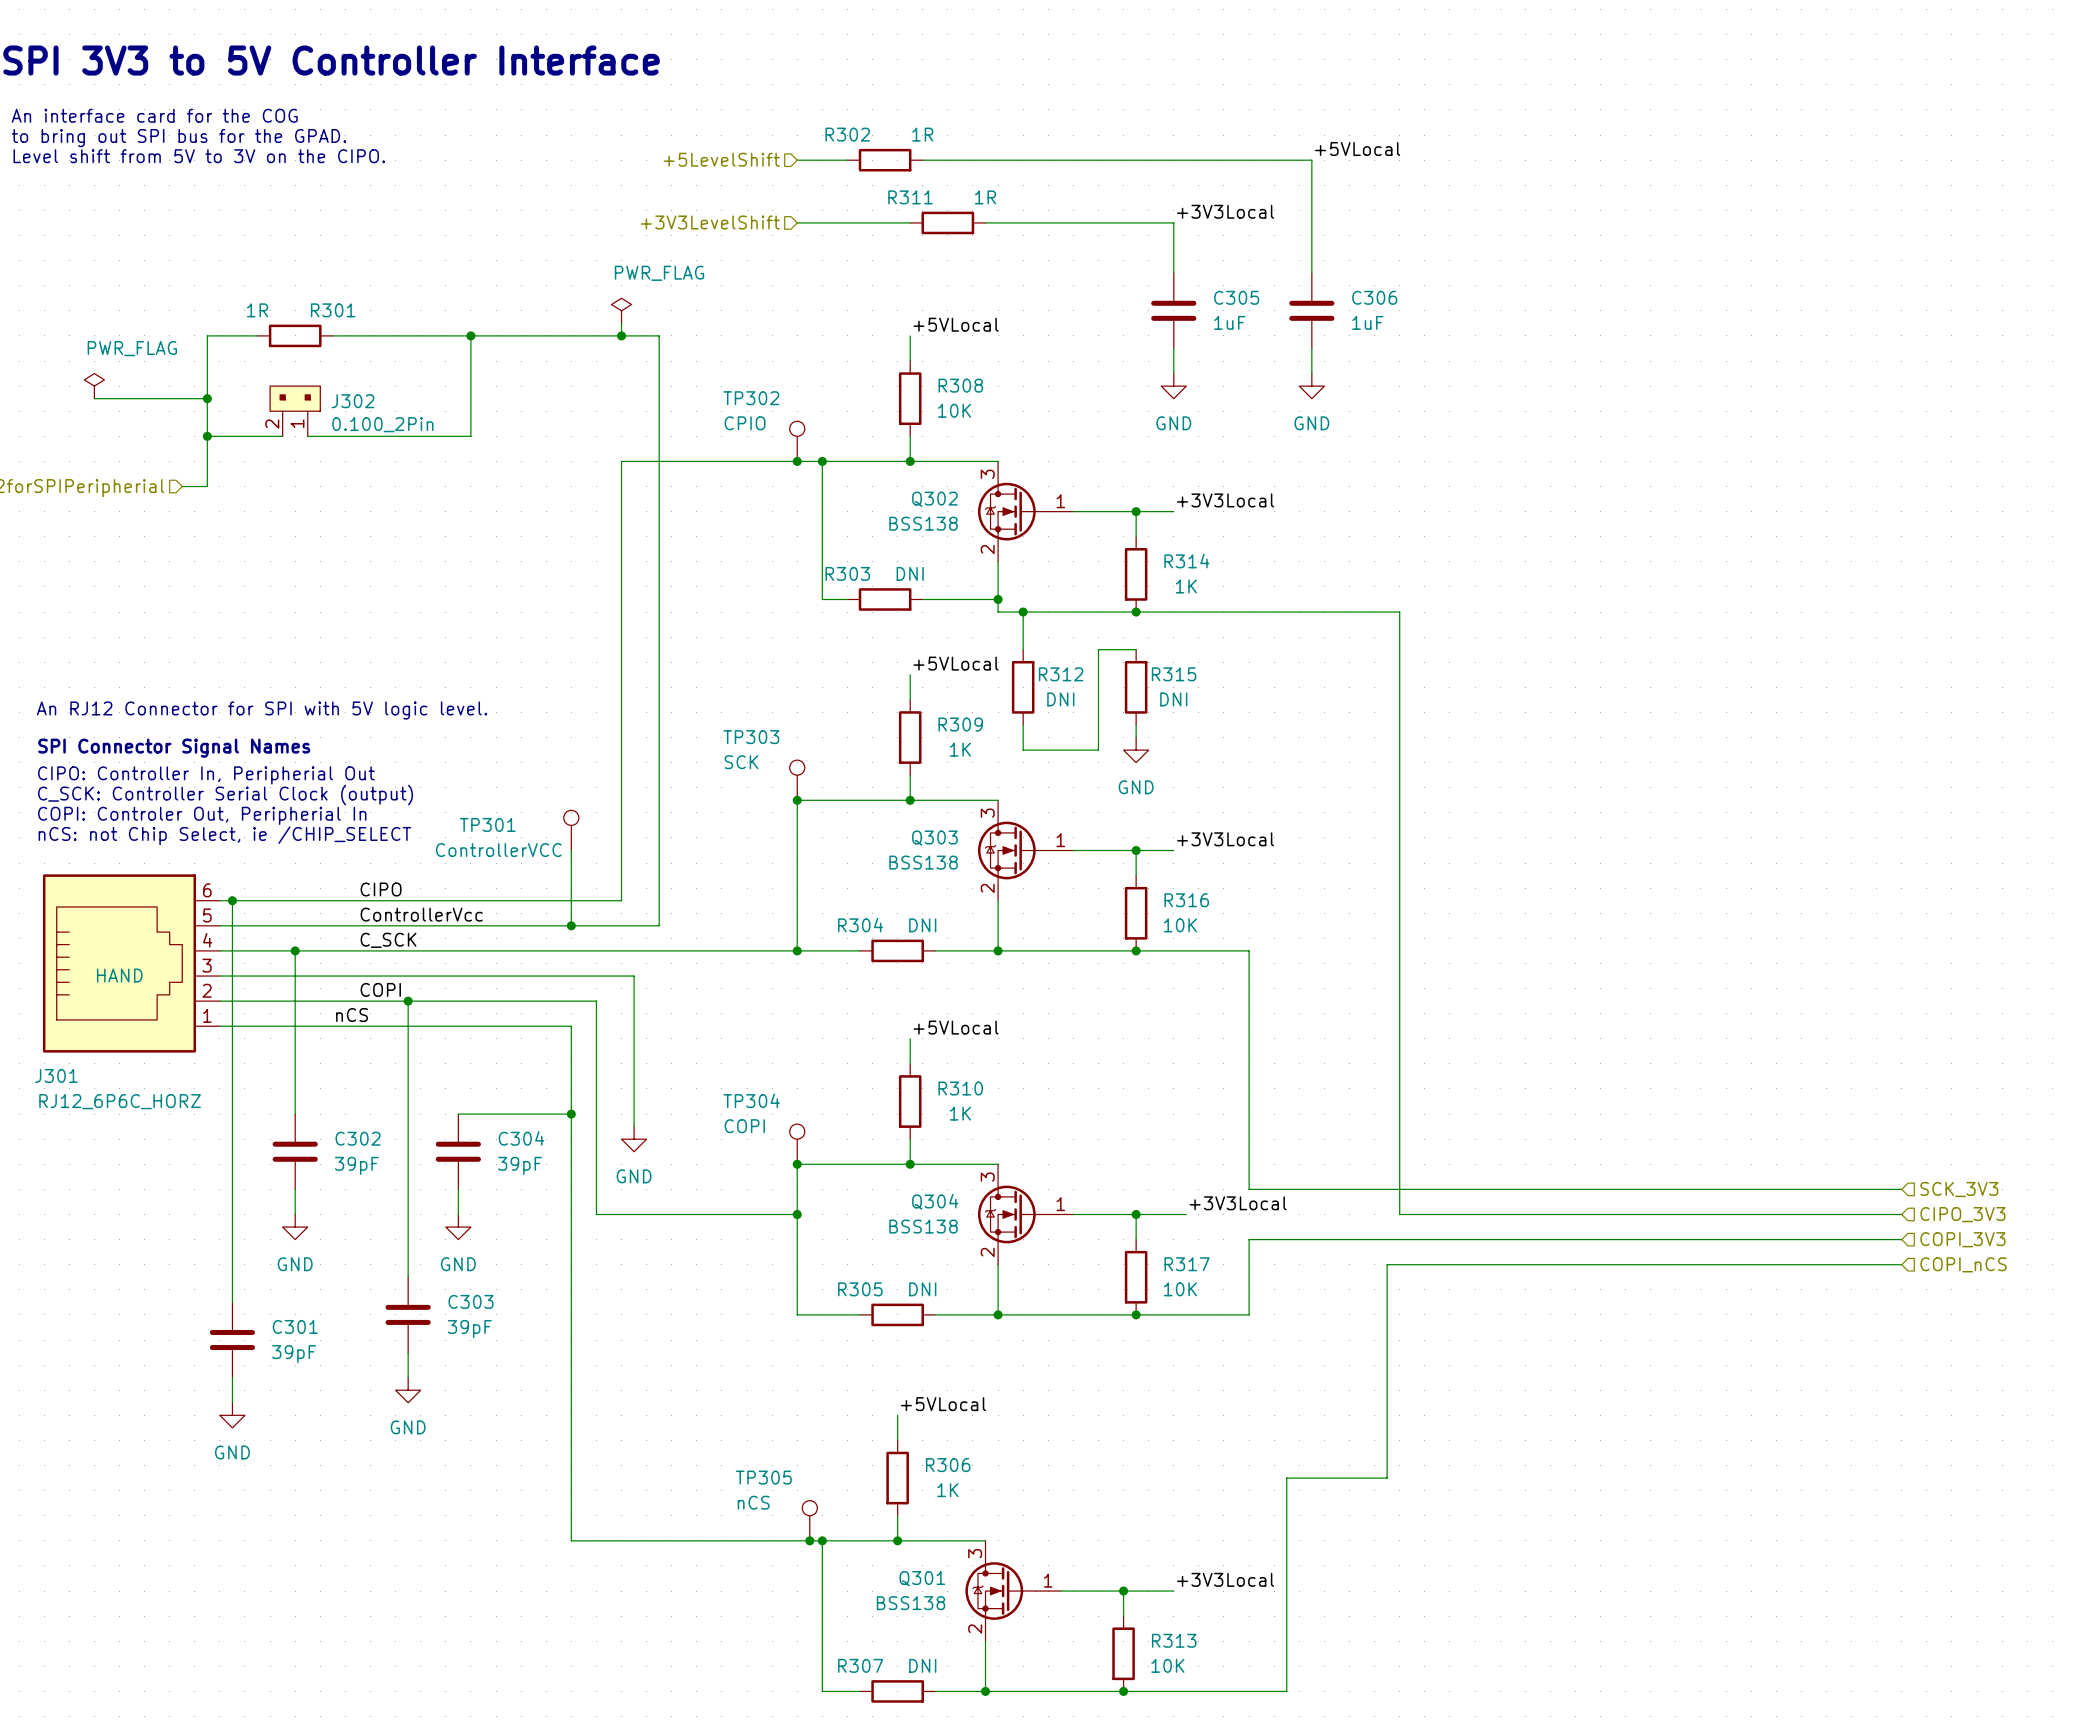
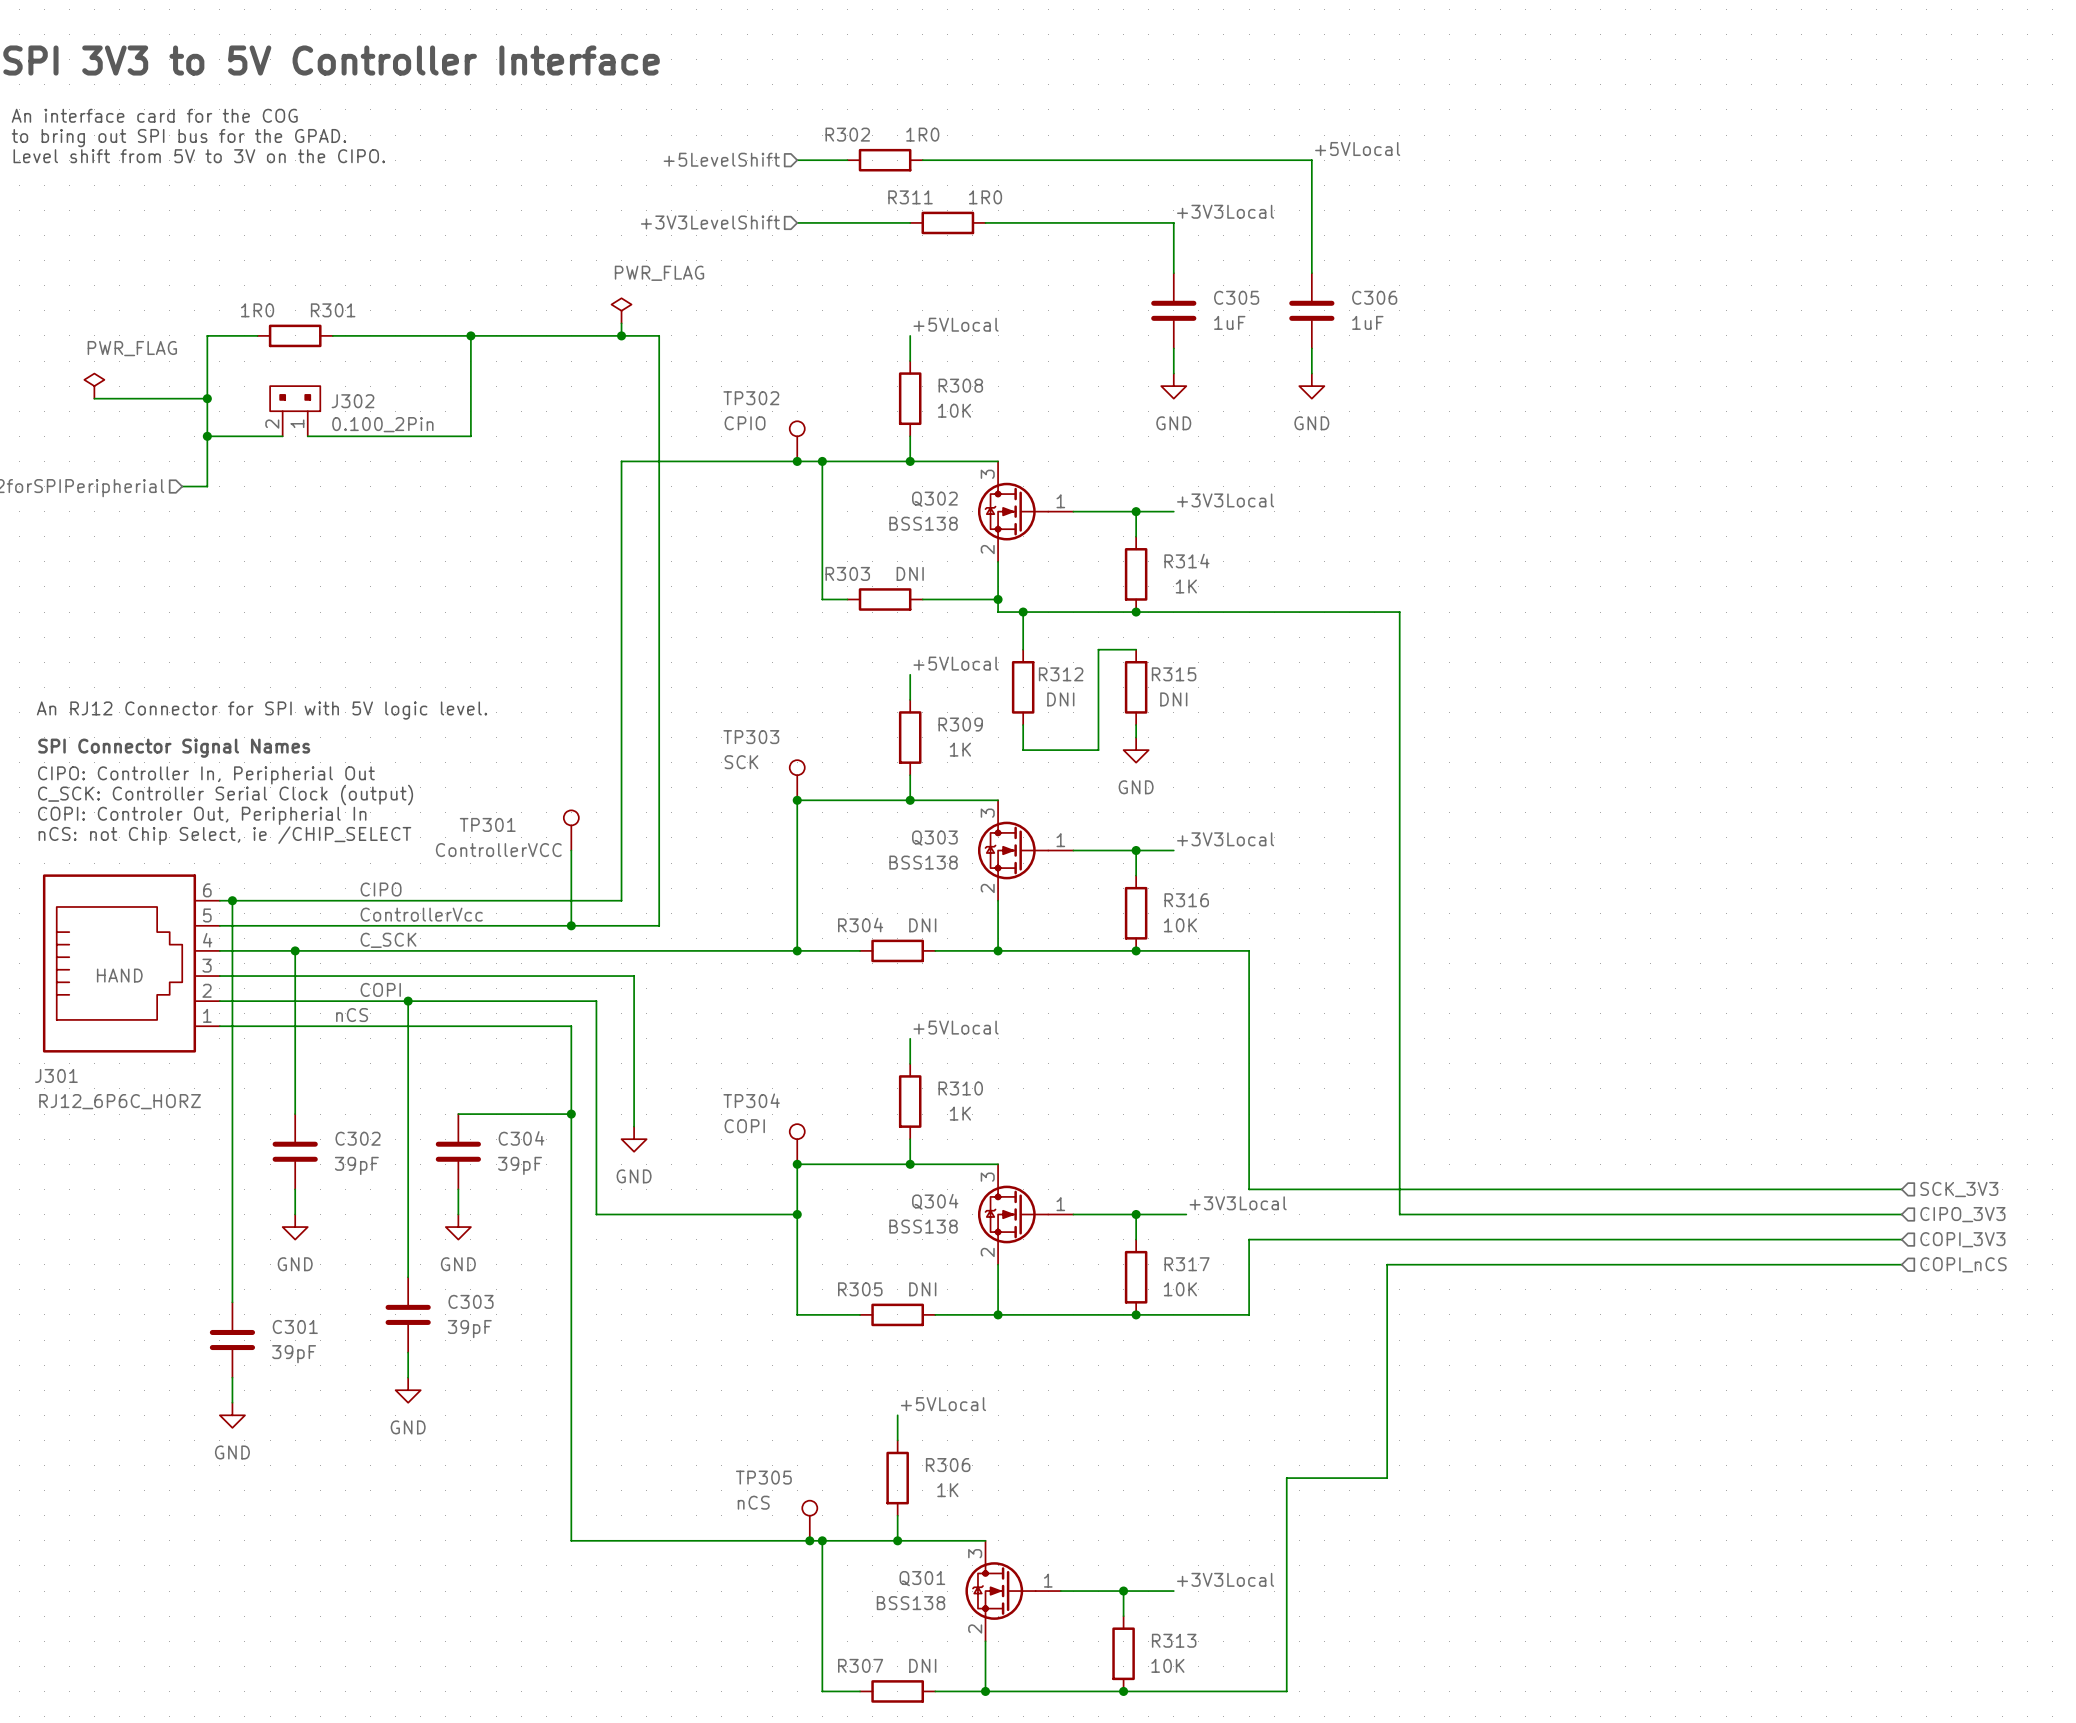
R302 value: 1R (922, 134) -> 1R0 (922, 134)
R311 value: 1R (985, 197) -> 1R0 (985, 197)
R301 value: 1R (257, 310) -> 1R0 (257, 310)

